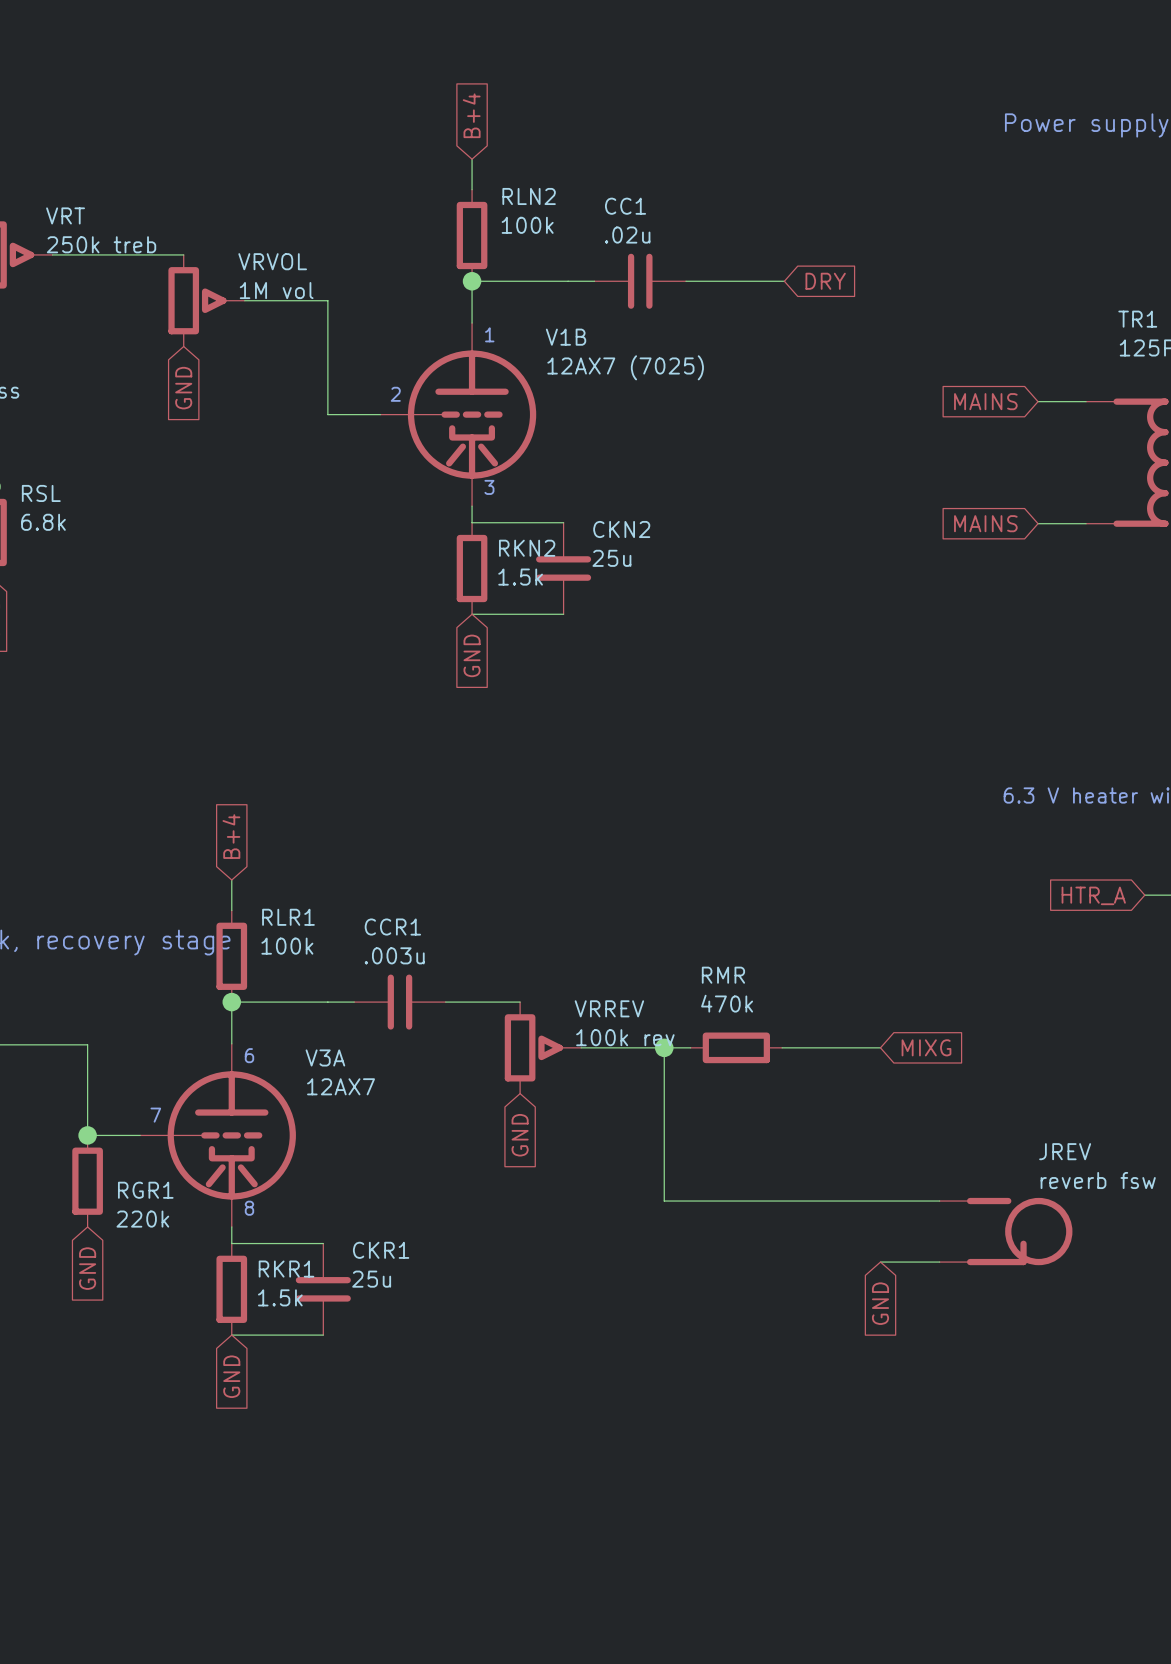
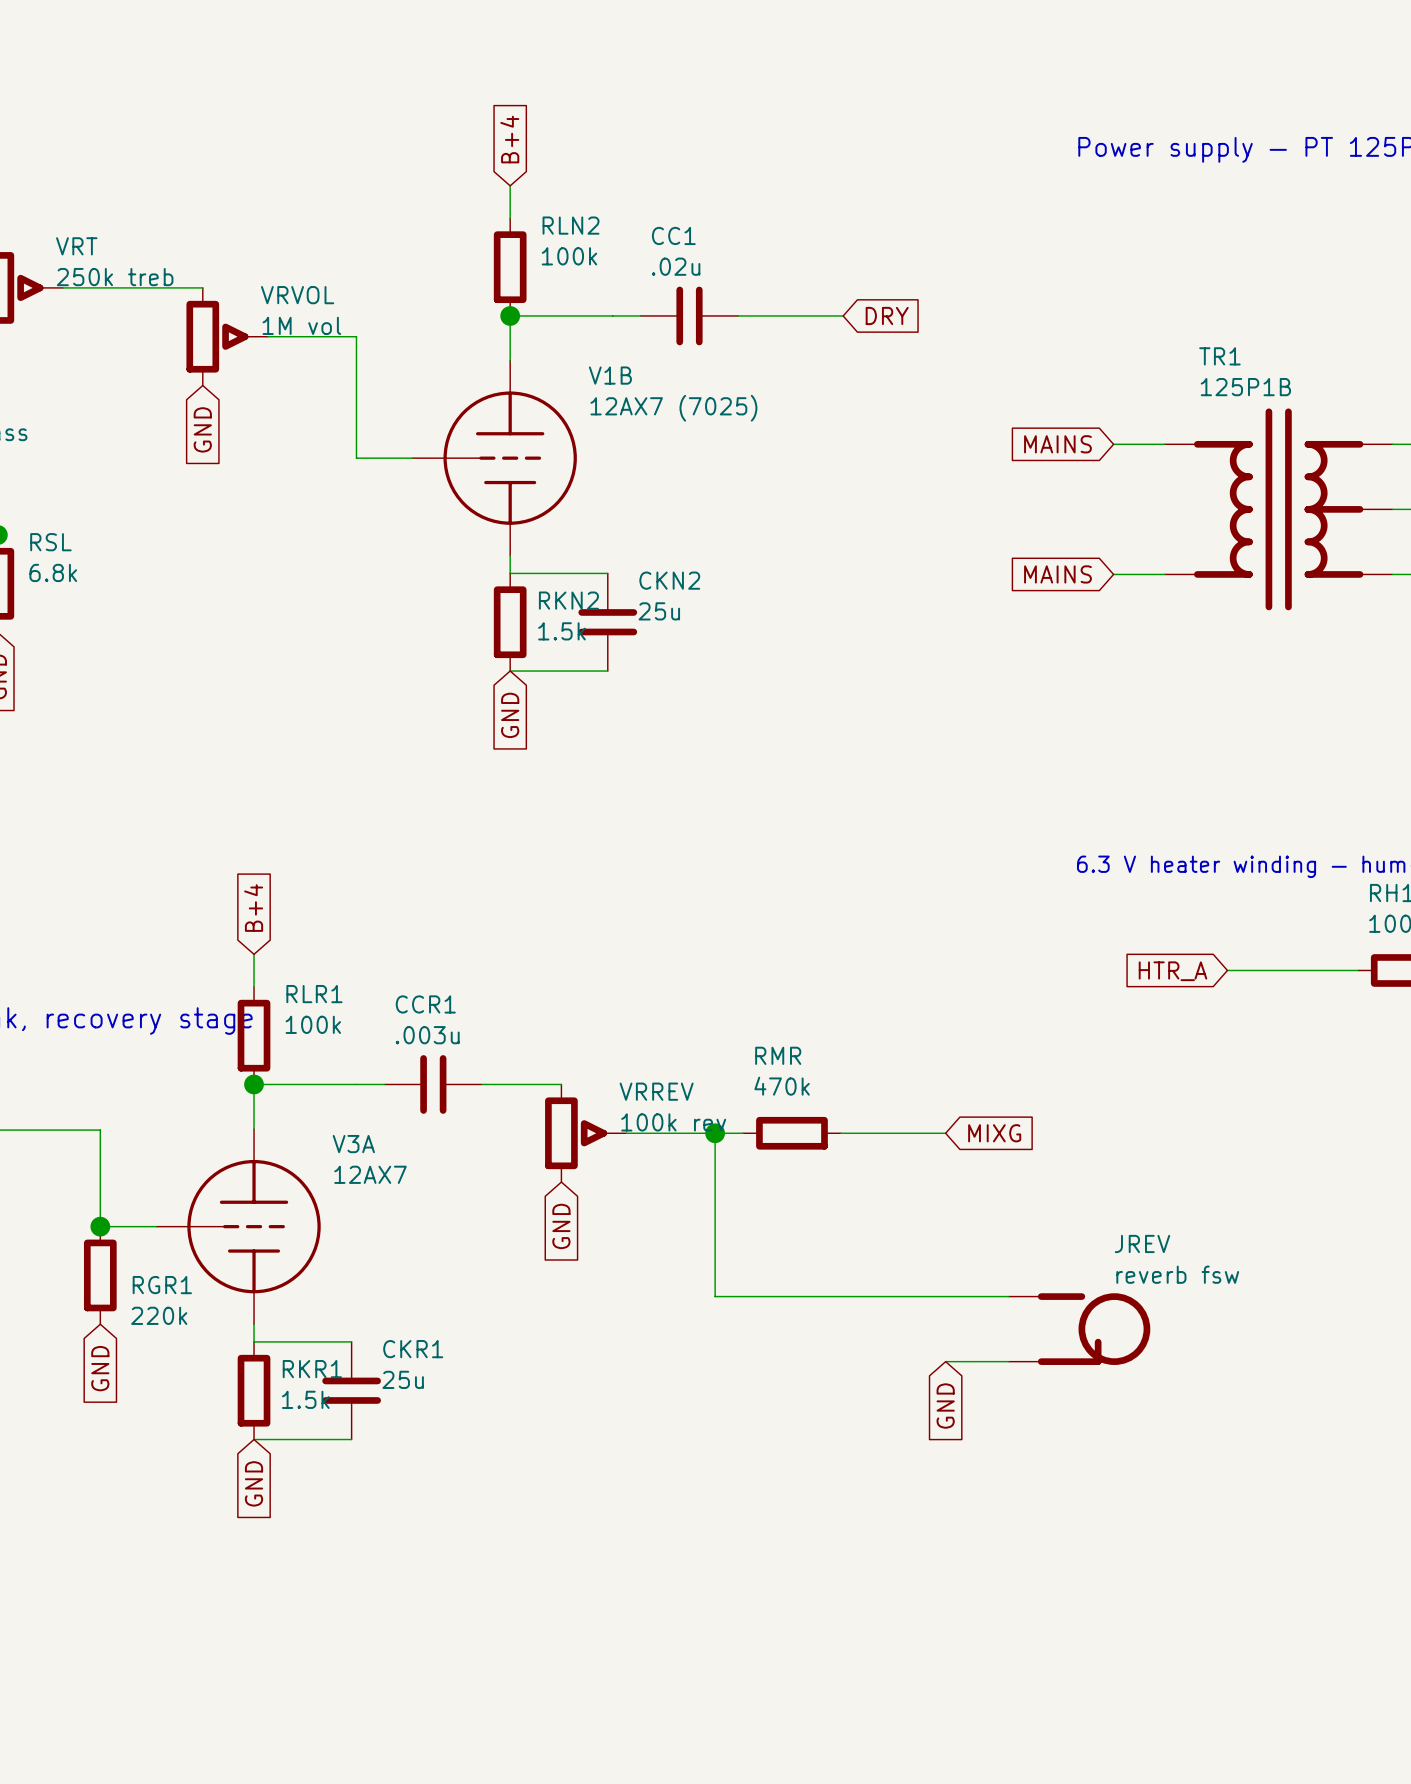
V1B symbol: [380, 323, 537, 507] -> [412, 360, 577, 556]
text: 1 (489, 334) -> none
text: 2 (395, 394) -> none
text: 3 (489, 487) -> none
V3A symbol: [140, 1043, 296, 1227] -> [156, 1129, 321, 1325]
text: 6 (249, 1055) -> none
text: 7 (155, 1115) -> none
text: 8 (249, 1208) -> none

